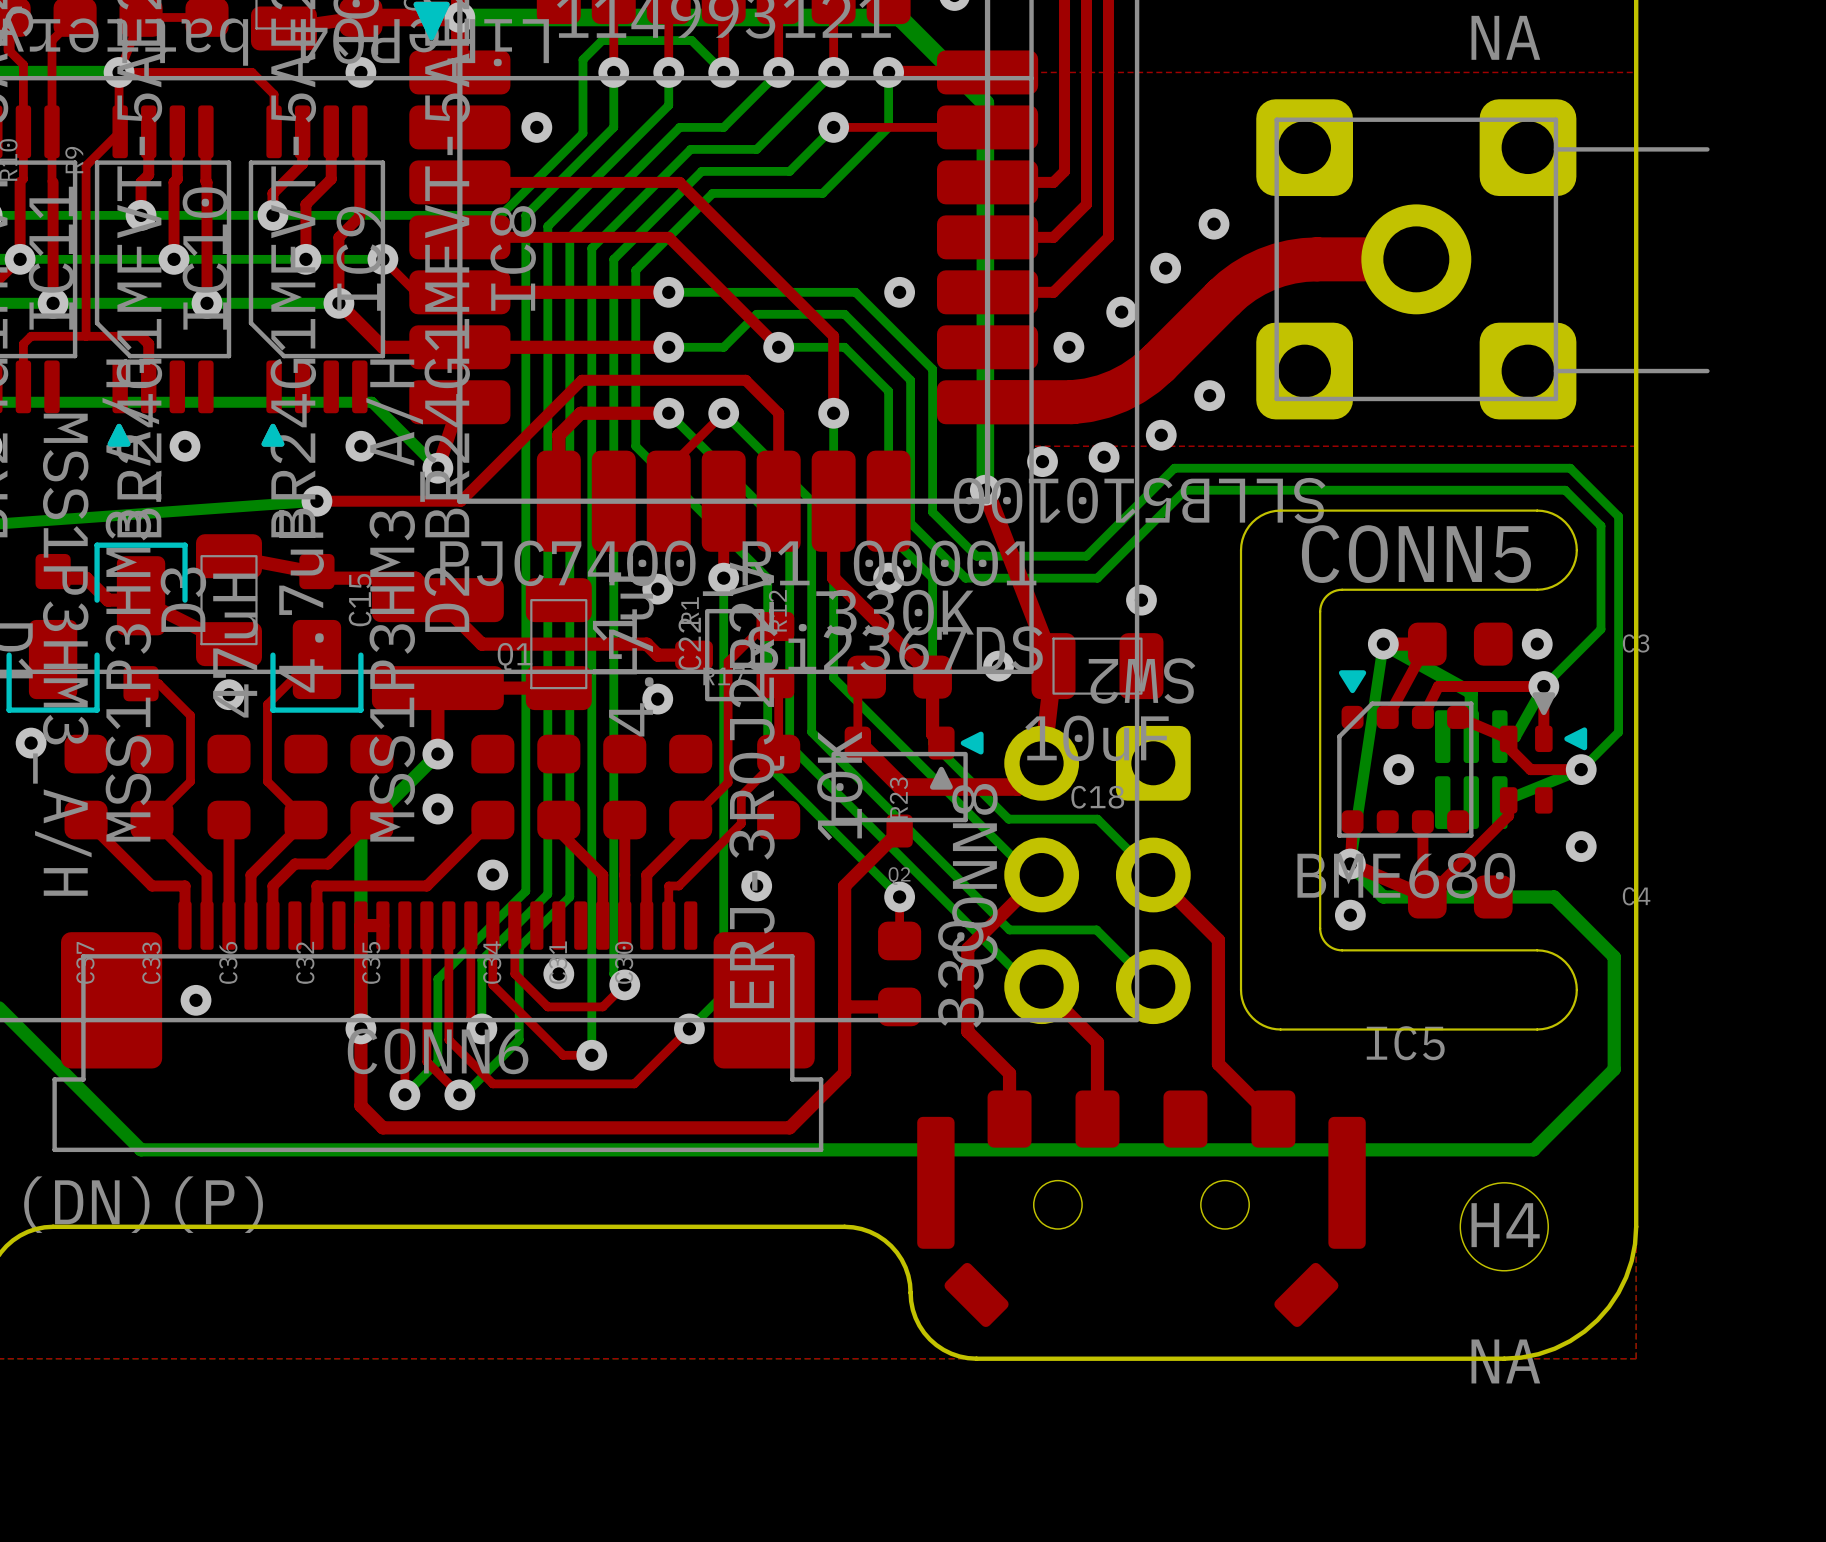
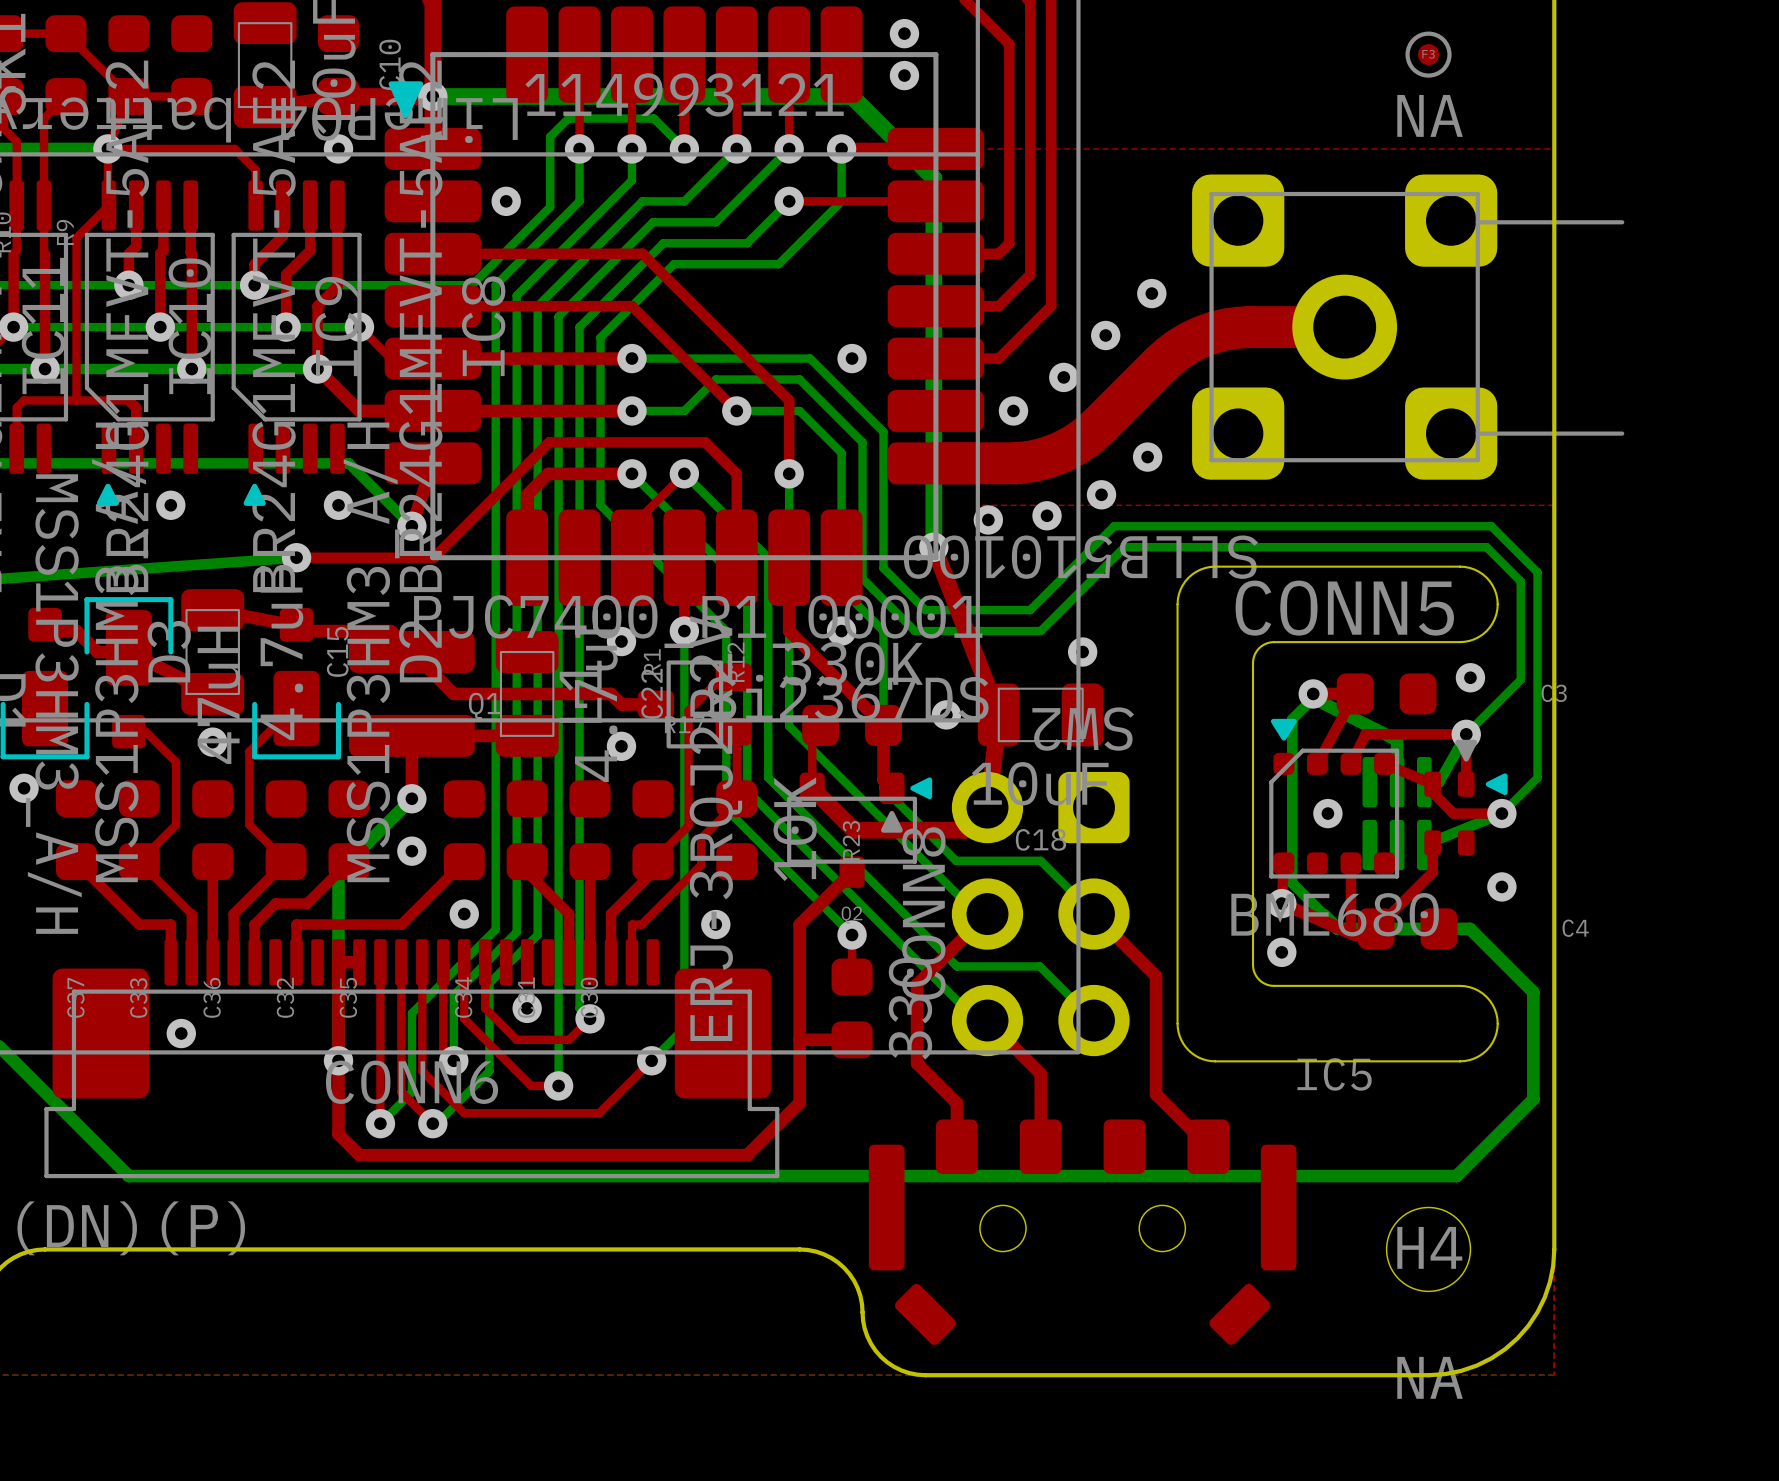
via position: (1537, 644) -> (1470, 677)
bottom track: (1471, 692) (1383, 644) (1350, 864) (1383, 896) (1554, 896) -> (1397, 740) (1313, 698) (1292, 719) (1292, 883) (1337, 928) (1470, 928) (1476, 935)
top track: (1508, 815) (1427, 896) -> (1432, 857) (1432, 872) (1376, 928)
C4 position: (1460, 896) -> (1407, 928)

